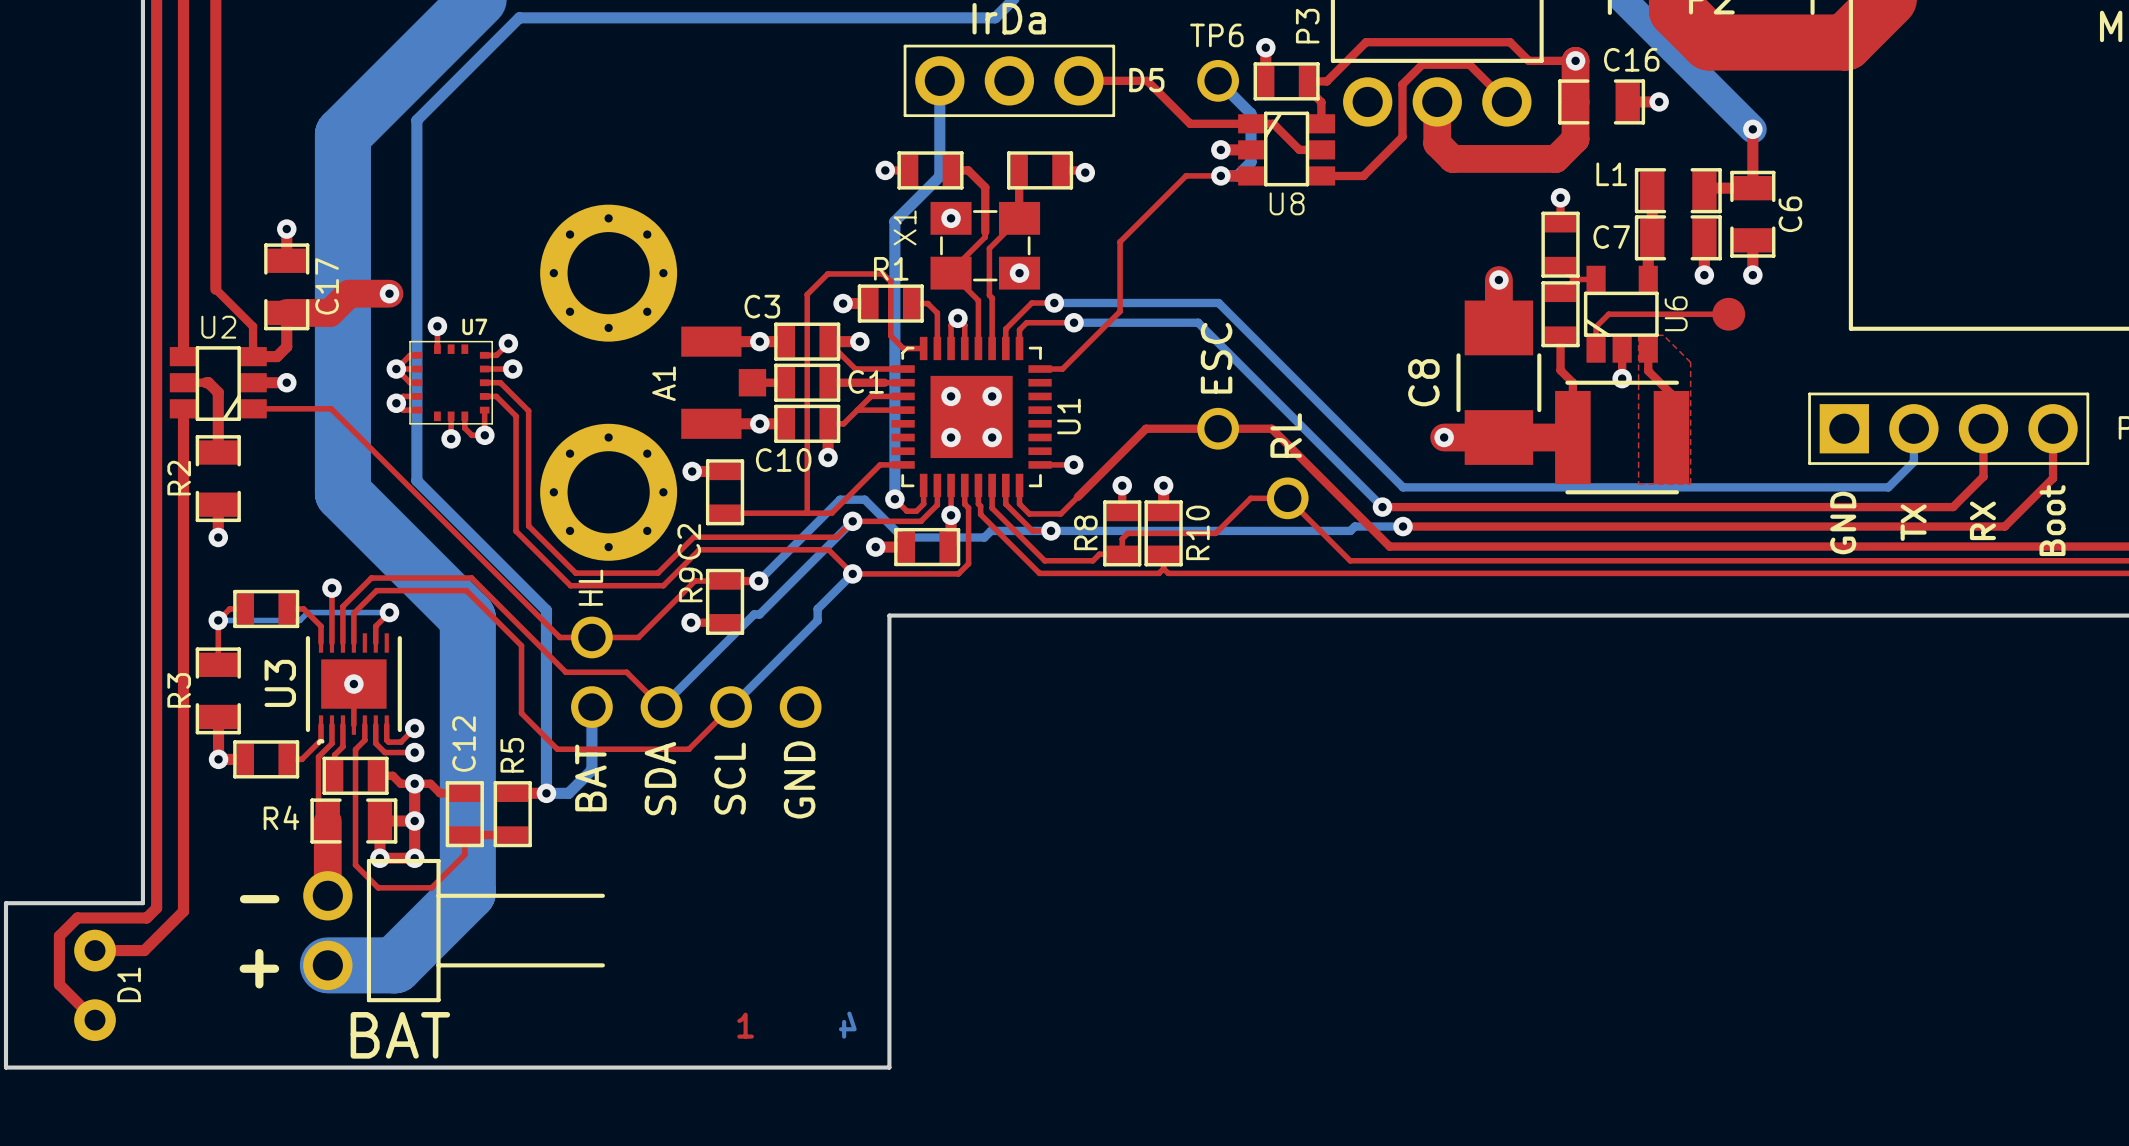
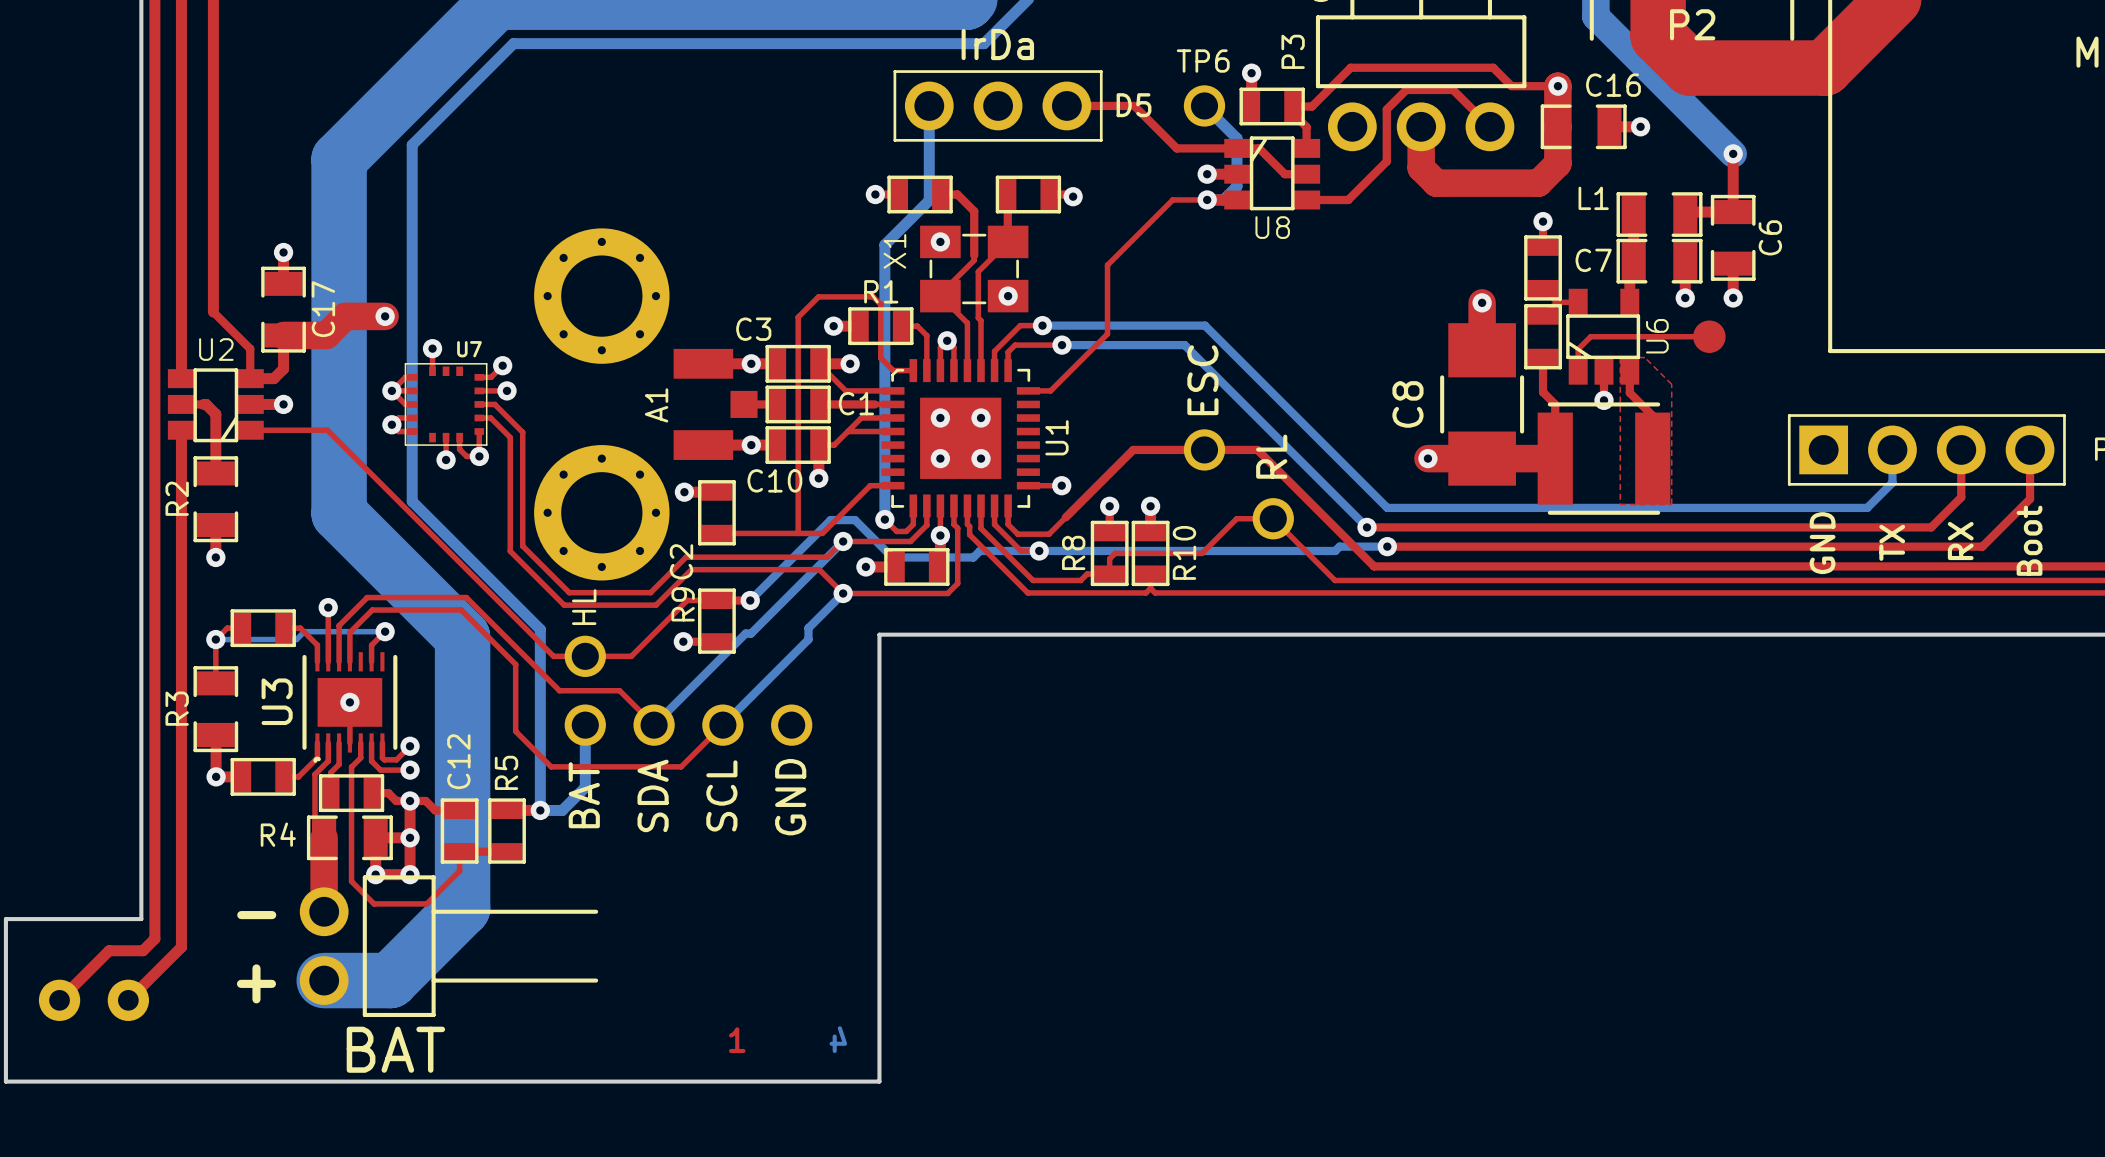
top track: (156, 908) (146, 917) (77, 917) (59, 936) (59, 984) (95, 1020) -> (154, 923) (154, 938) (142, 950) (109, 950) (59, 1000)
top track: (183, 911) (144, 950) (95, 950) -> (181, 927) (181, 947) (128, 1000)
D1: (95, 985) -> none
part: none -> (93, 1000)

